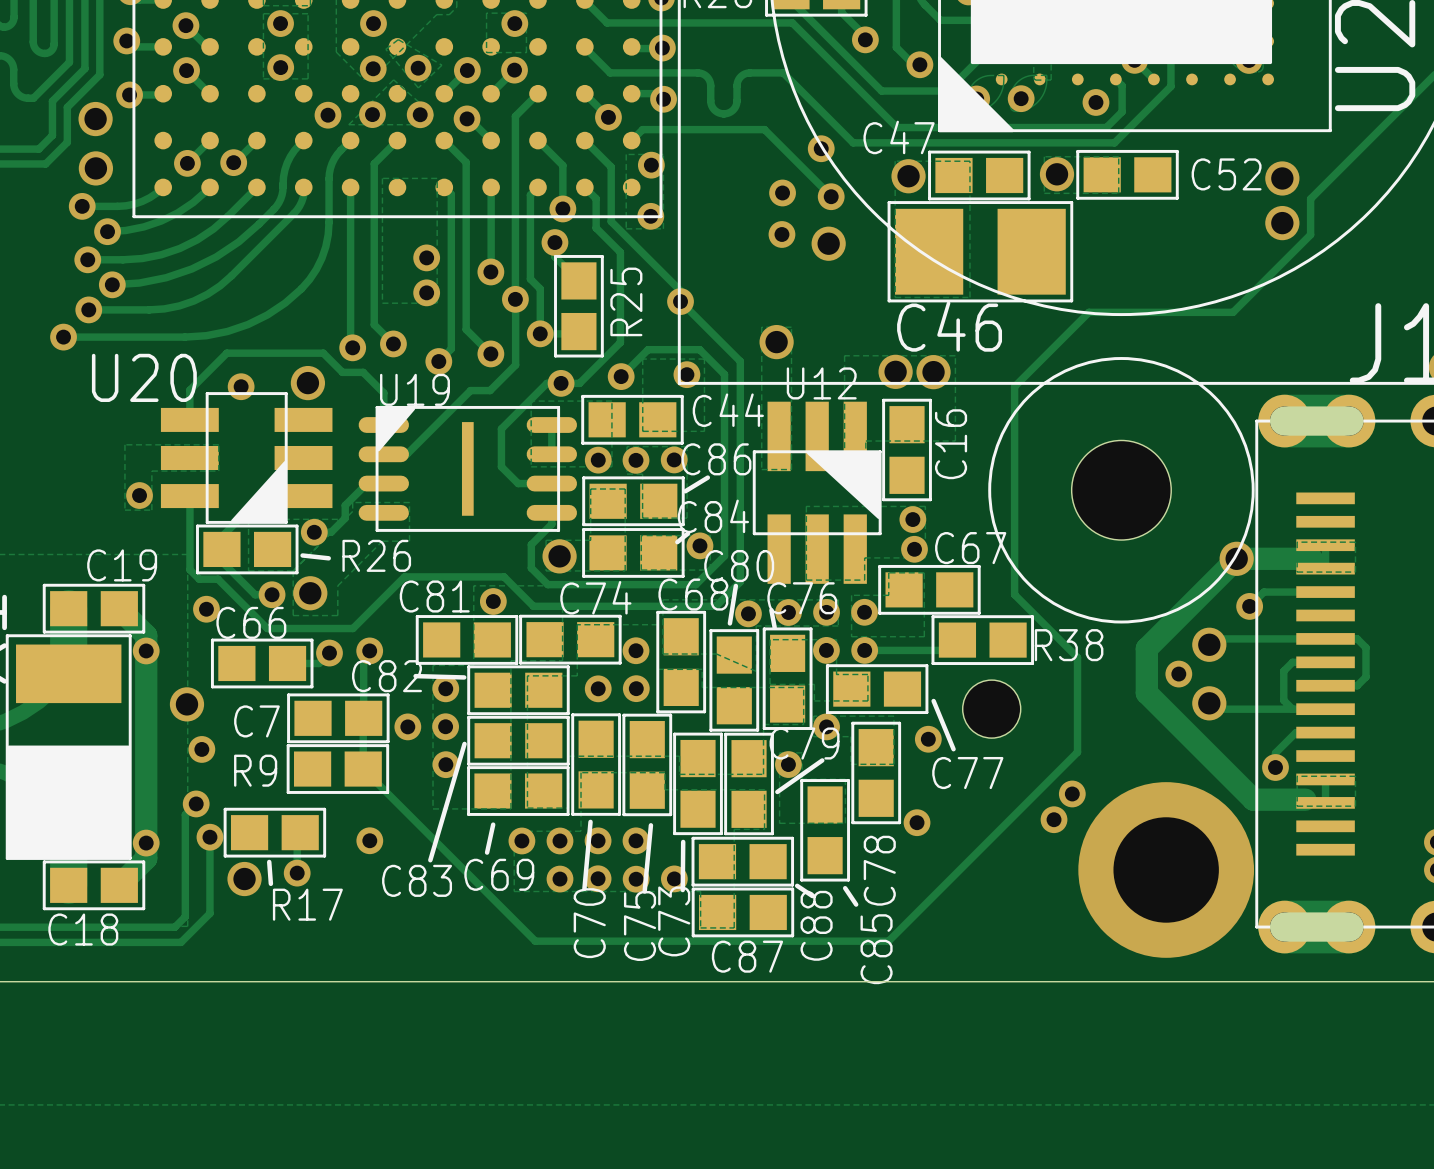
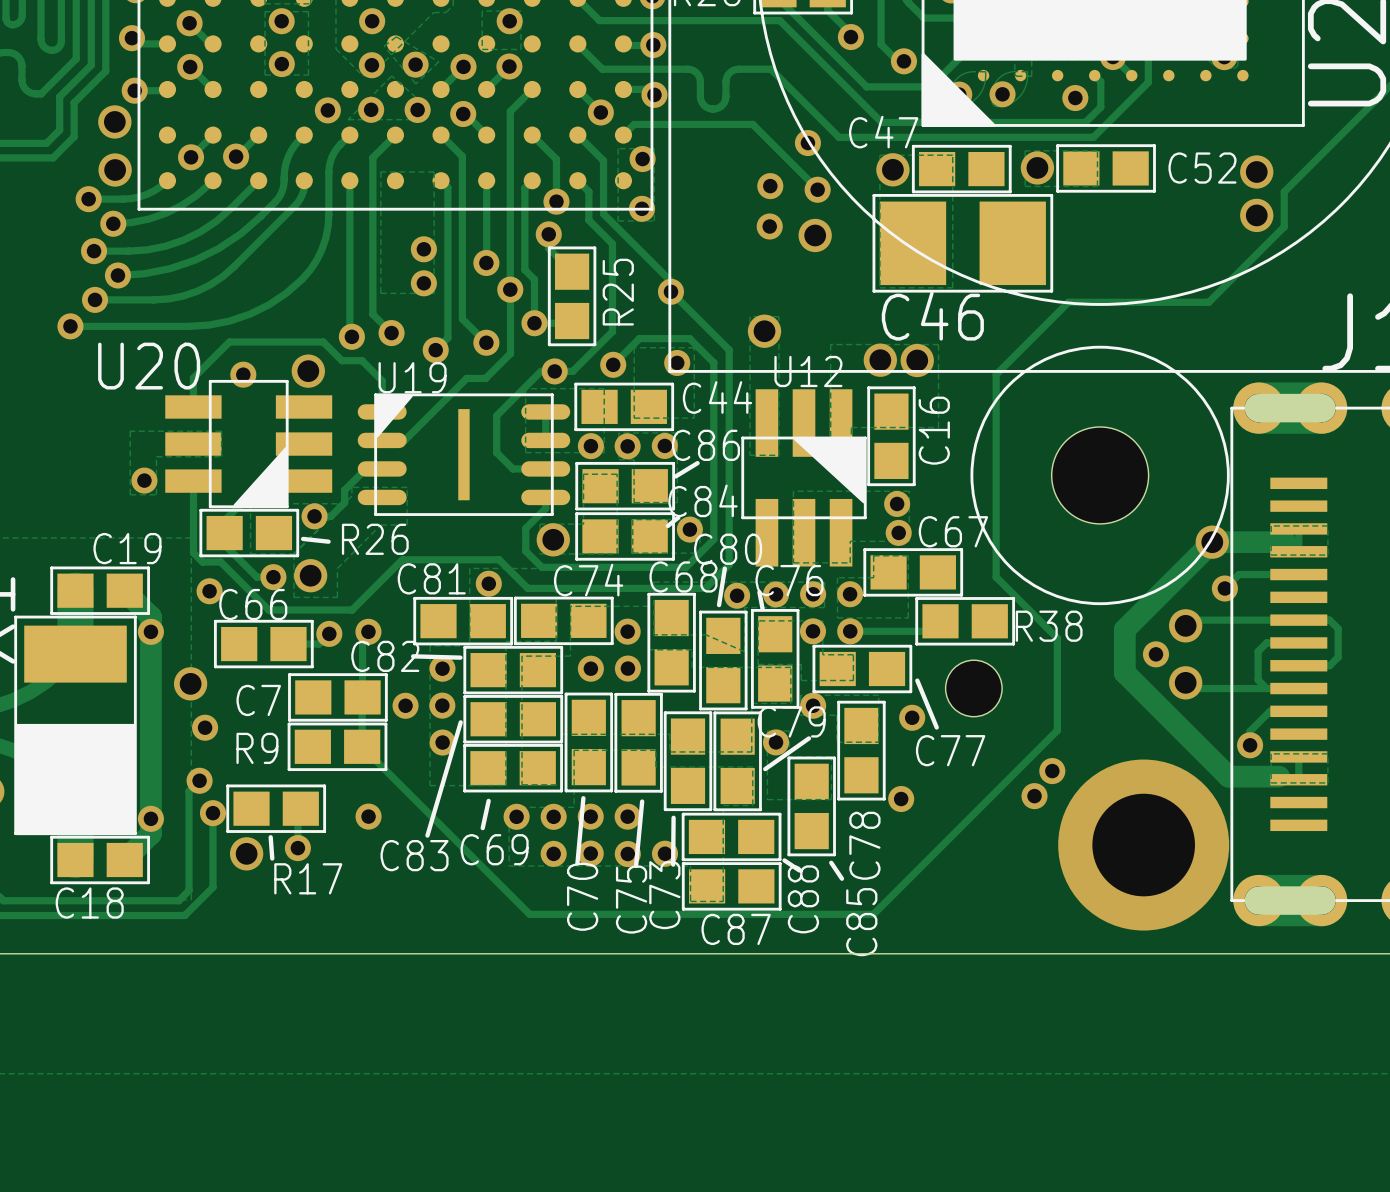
via position: (95, 119) -> (114, 121)
via position: (95, 168) -> (115, 170)

